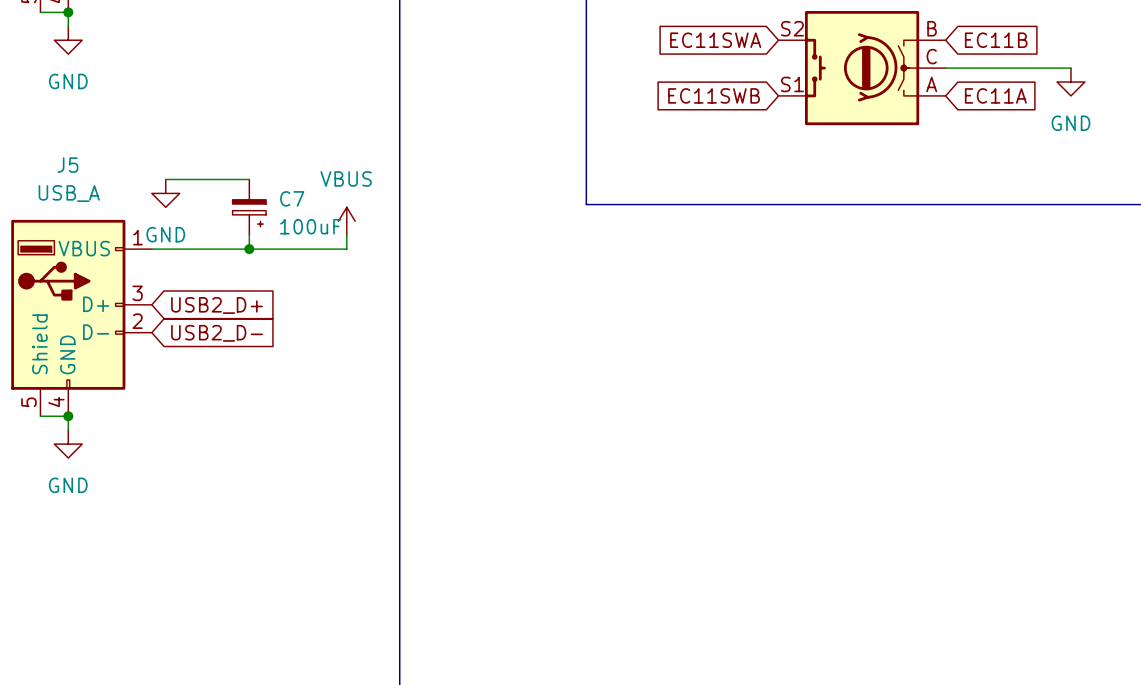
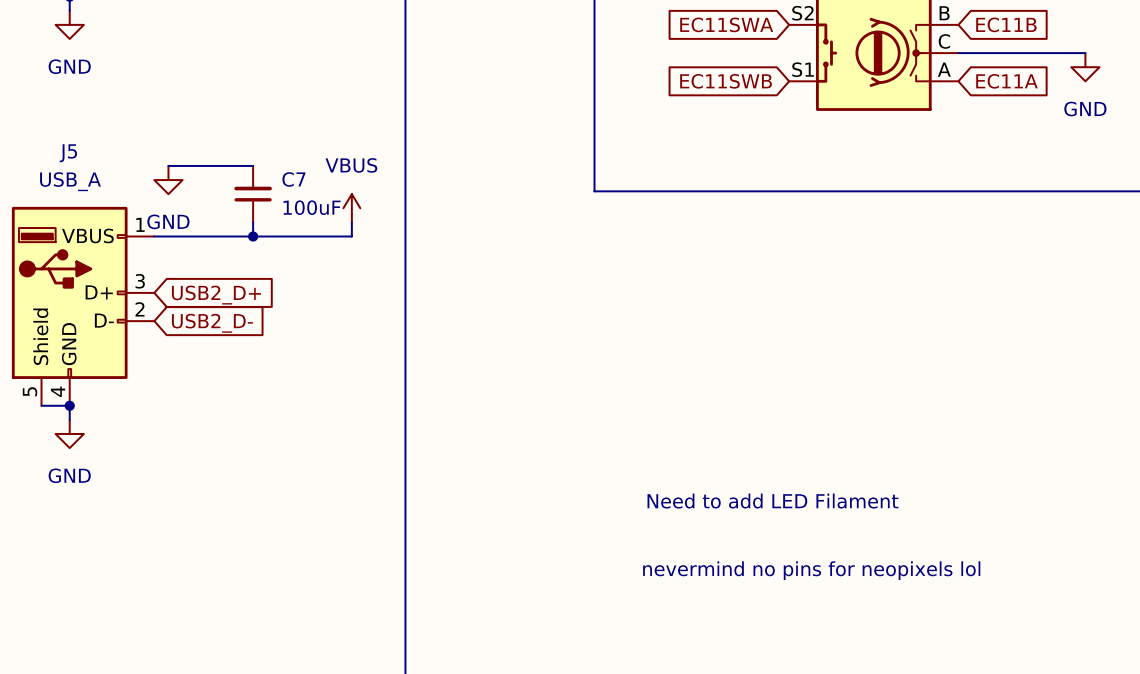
C7 symbol: [232, 179, 267, 236] -> [234, 165, 272, 223]
text: none -> Need to add LED Filament (772, 501)
text: none -> nevermind no pins for neopixels lol (811, 570)

